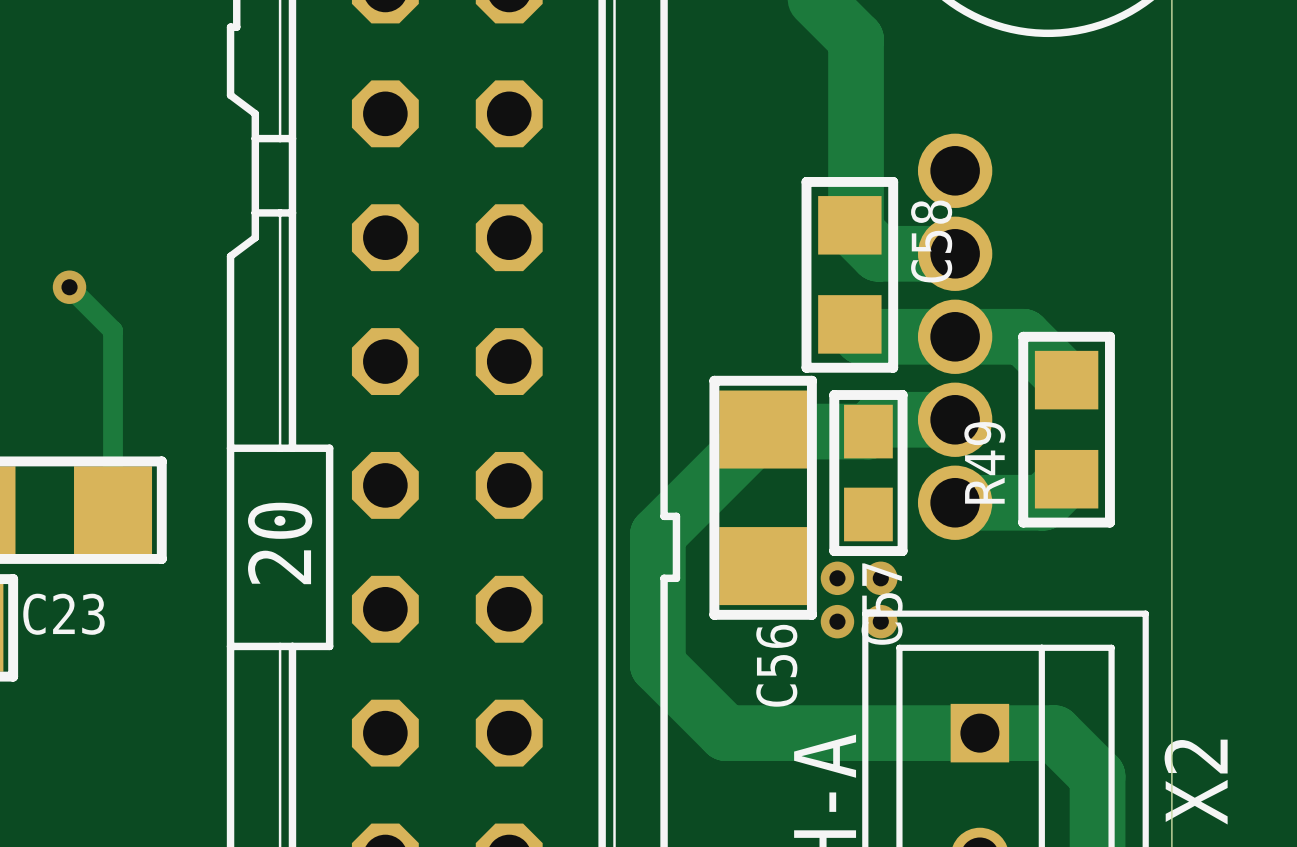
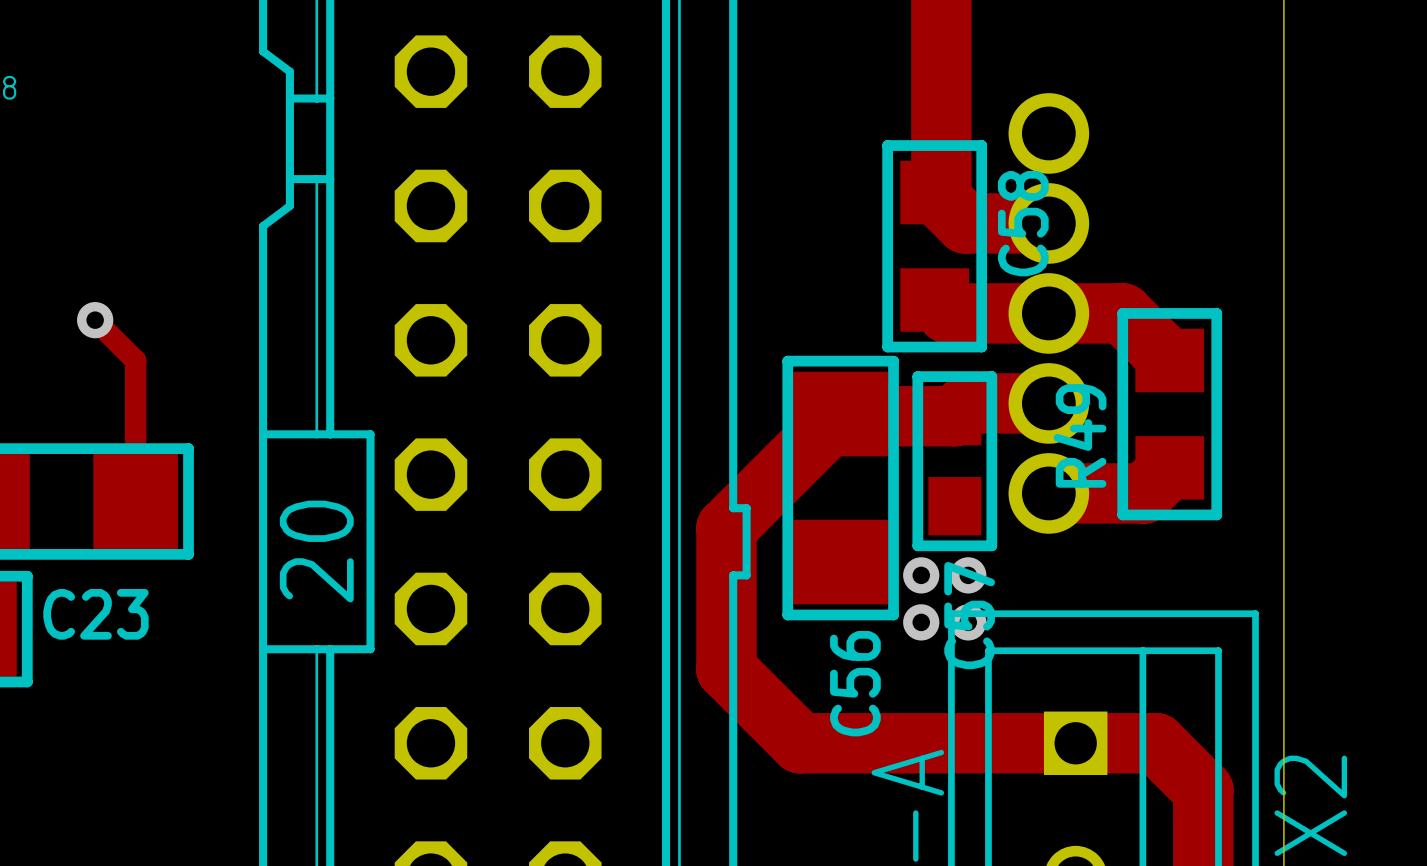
track: (69, 287) (113, 330) (113, 380) -> (95, 320) (135, 360)
via position: (69, 287) -> (95, 320)

